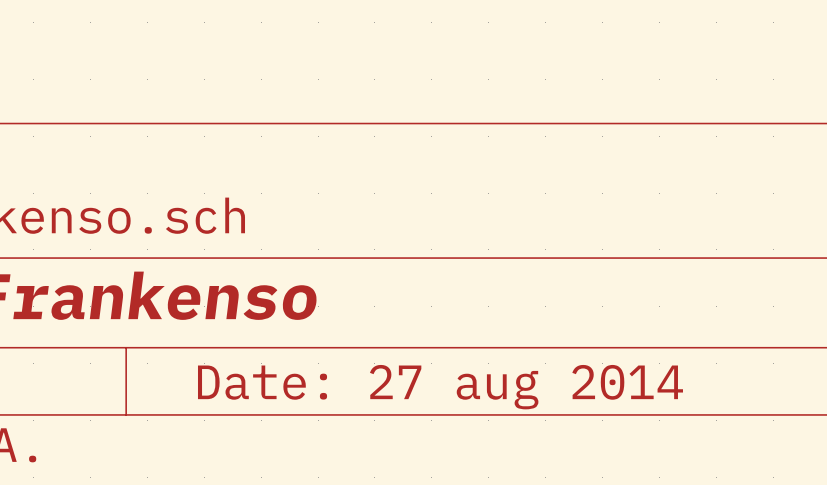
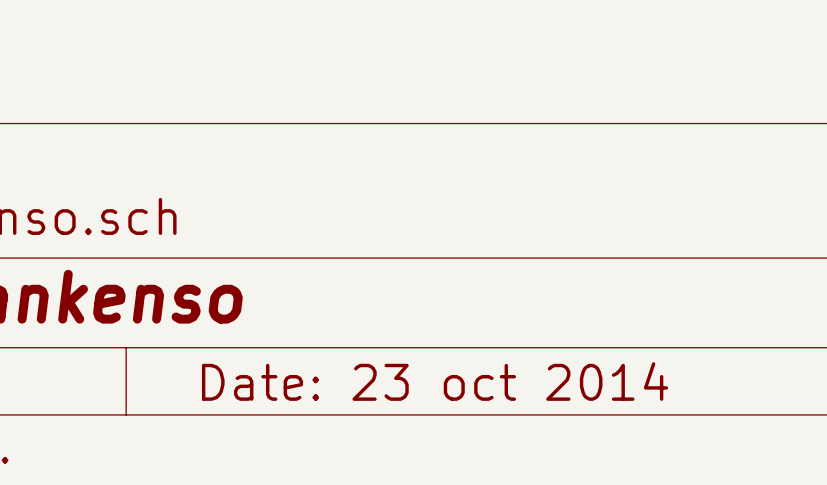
title block: Date: 27 aug 2014 (440, 387) -> Date: 23 oct 2014 (435, 381)

